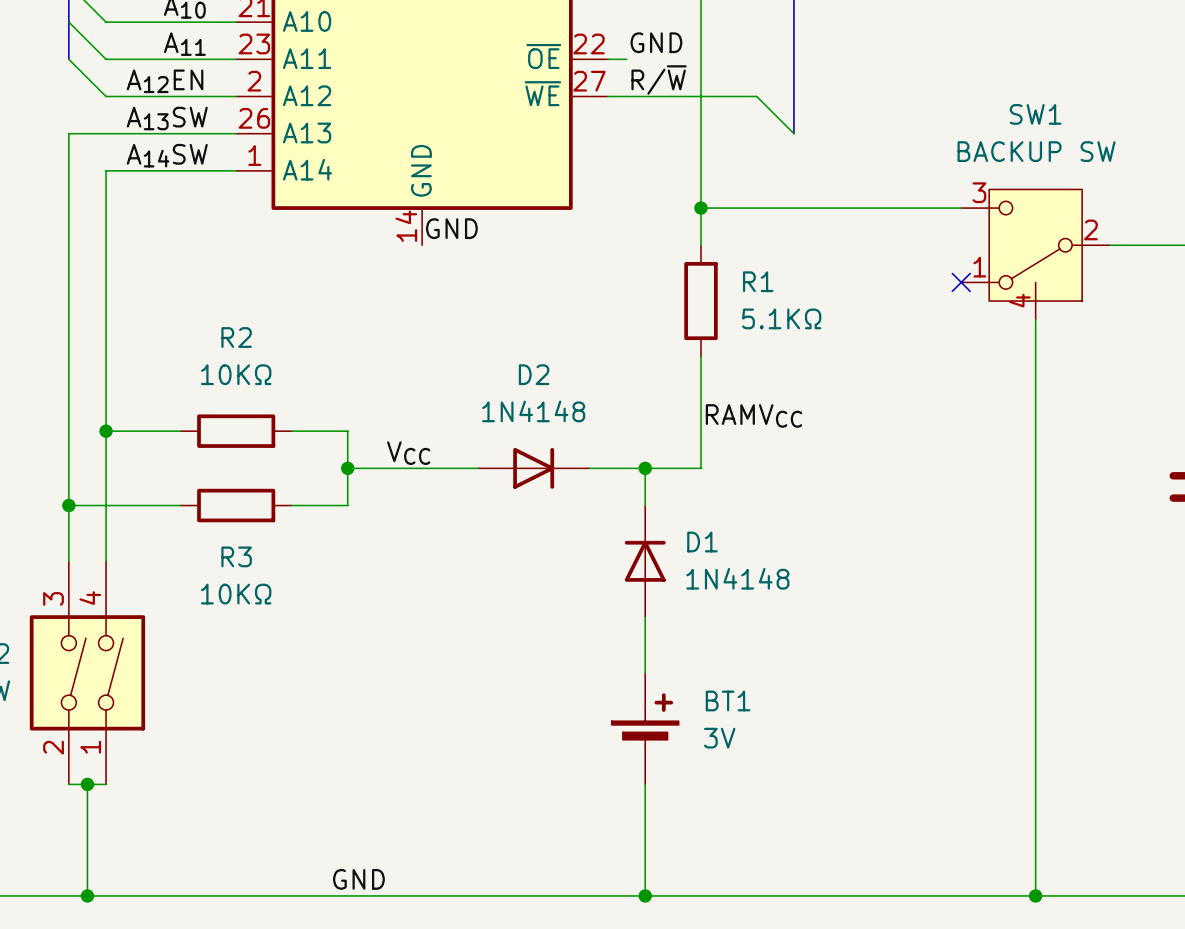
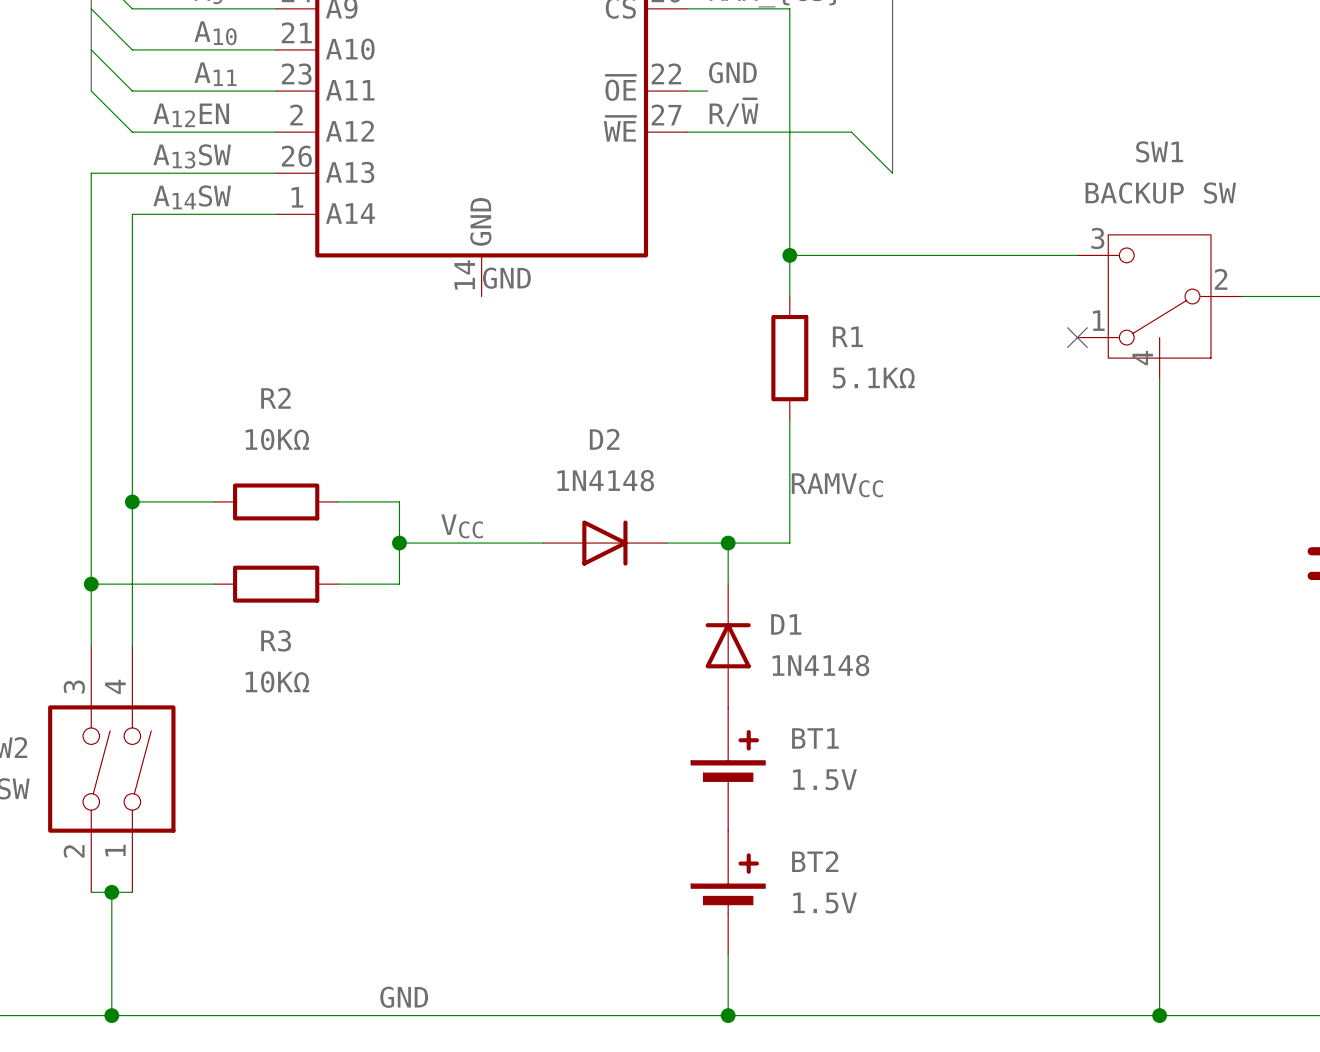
BT1 position: (645, 728) -> (728, 769)
BT1 value: 3V (719, 738) -> 1.5V (825, 779)
BT2: none -> 1.5V (728, 892)

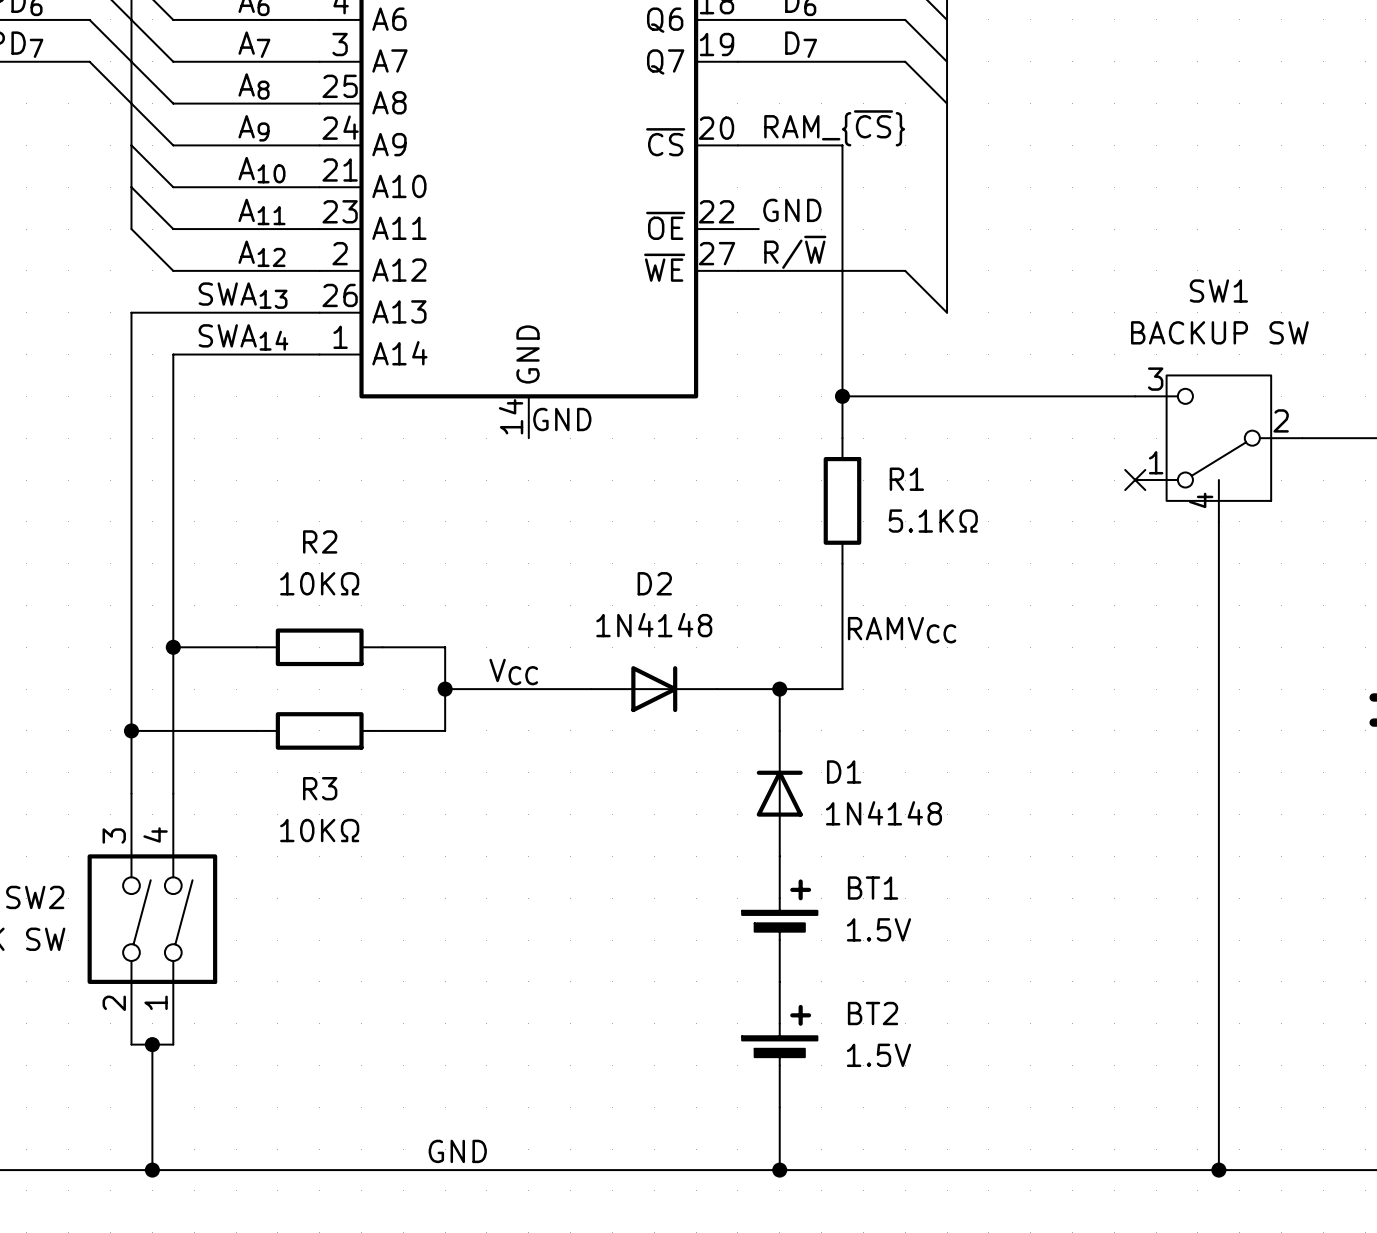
label: A12EN (191, 115) -> A12 (261, 253)
label: A13SW (192, 156) -> SWA13 (243, 295)
label: A14SW (192, 197) -> SWA14 (243, 337)

